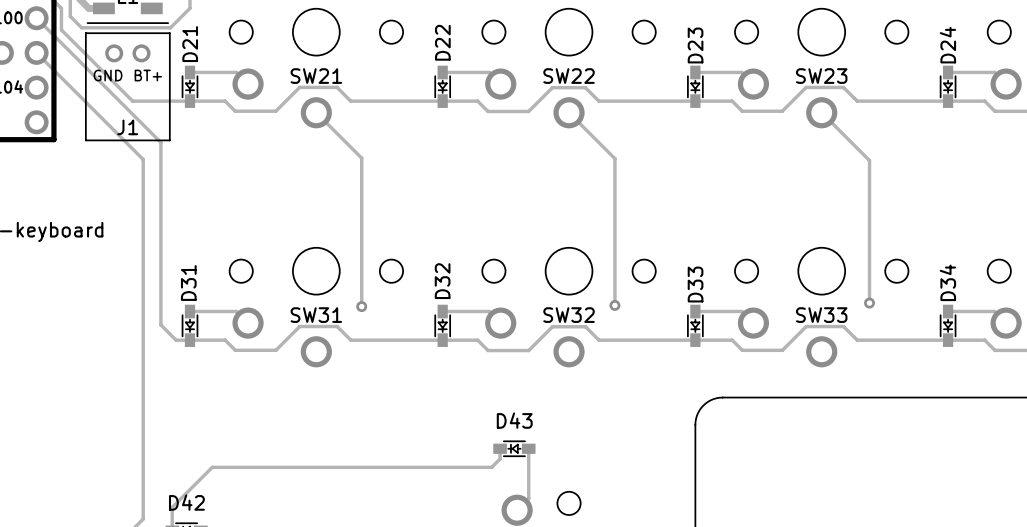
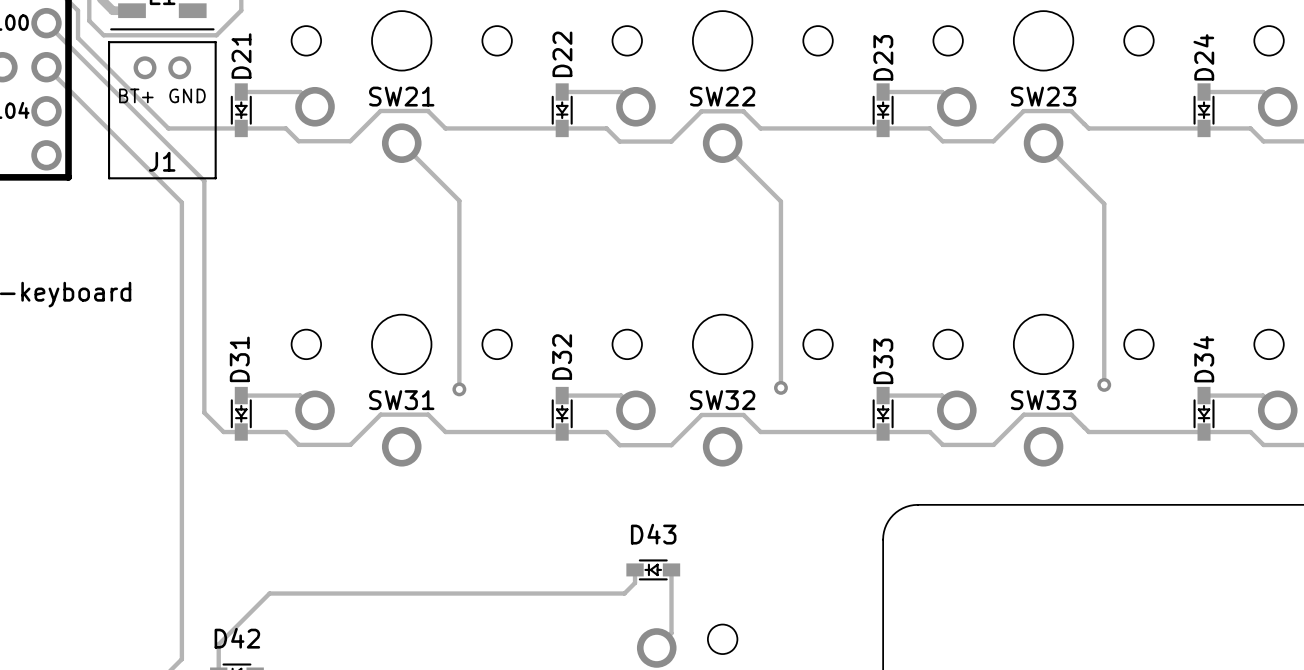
J1 text position: GND (108, 75) -> GND (187, 95)
J1 text position: BT+ (148, 75) -> BT+ (136, 95)

